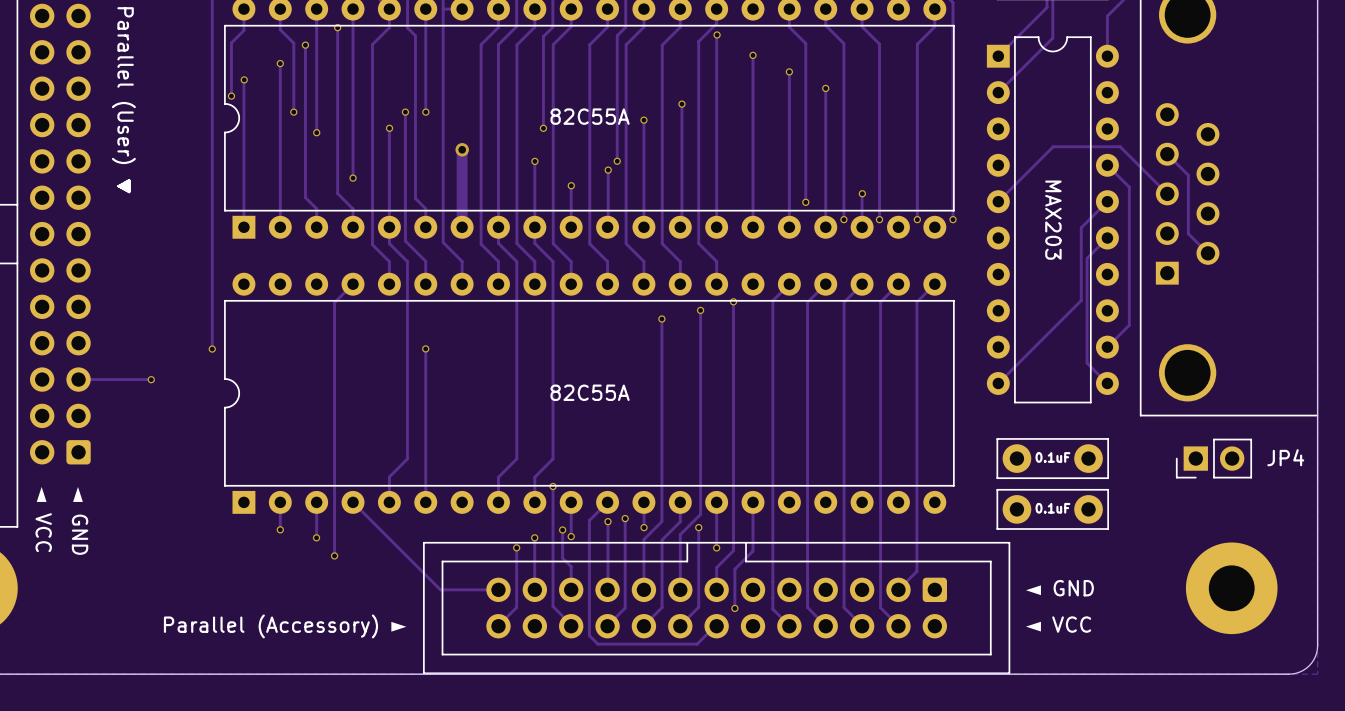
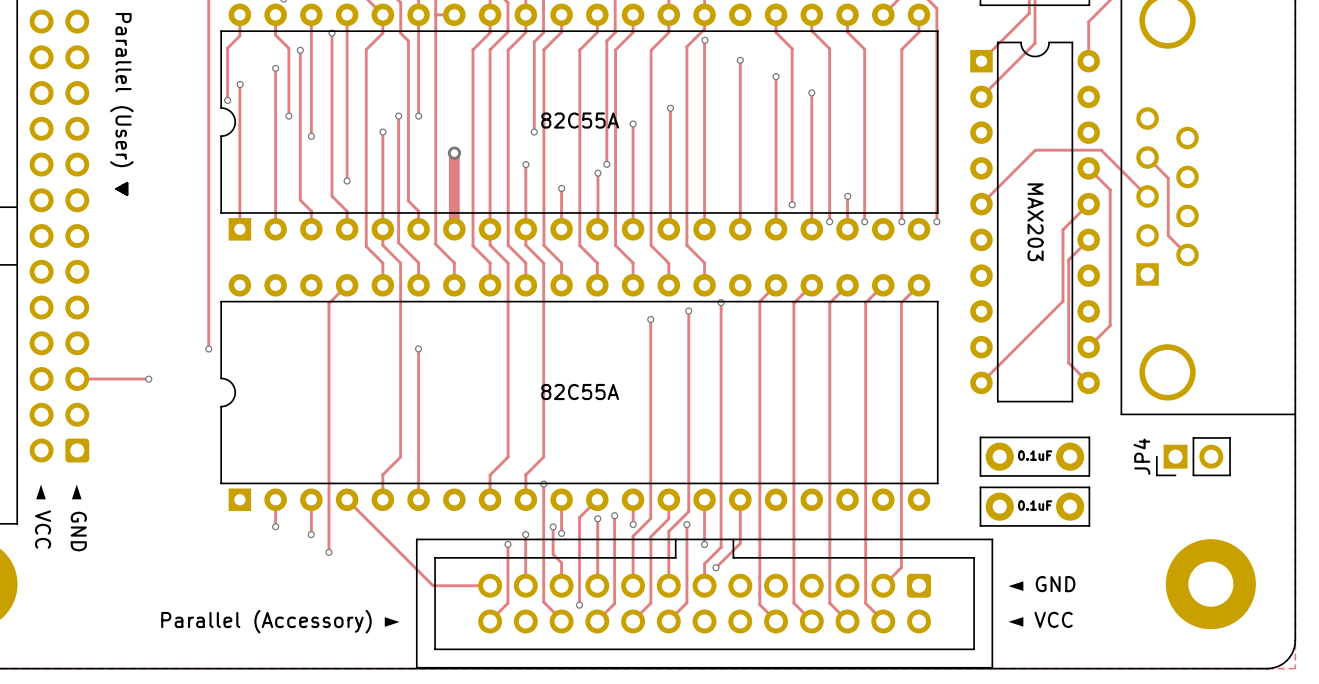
JP4 name rotation: 0° (1285, 457) -> 90° counterclockwise (1141, 456)
JP4 name position: JP4 (1285, 457) -> JP4 (1141, 456)
track: (589, 520) (589, 635) (597, 644) (697, 644) (716, 624) -> (579, 517) (579, 605)
track: (753, 546) (753, 551) (734, 569) (734, 608) -> (740, 543) (715, 568)
via position: (734, 608) -> (716, 567)
via: none -> (579, 605)

